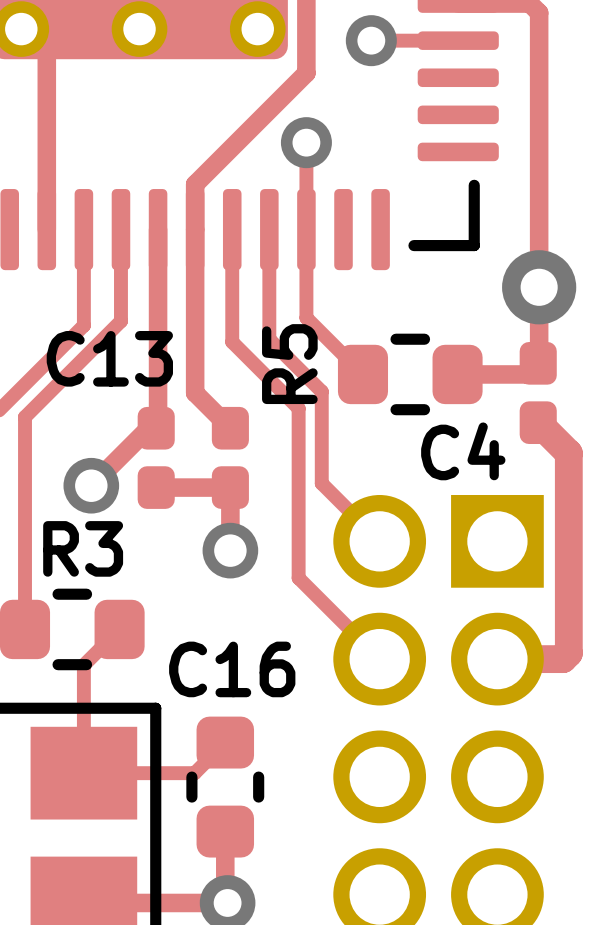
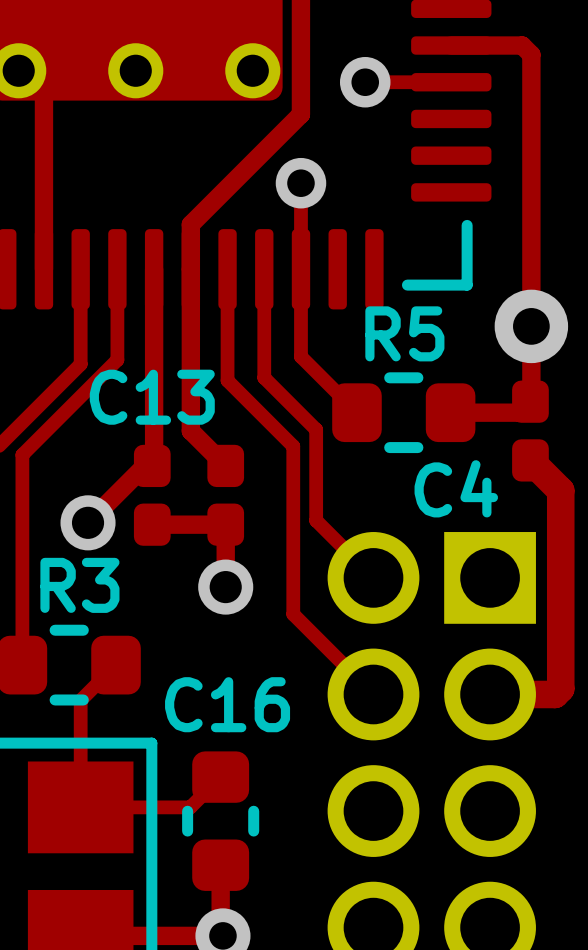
C13 name position: C13 (109, 358) -> C13 (152, 397)
R5 name rotation: 0° (289, 364) -> 90° clockwise (404, 333)
R5 name position: R5 (289, 364) -> R5 (404, 333)

